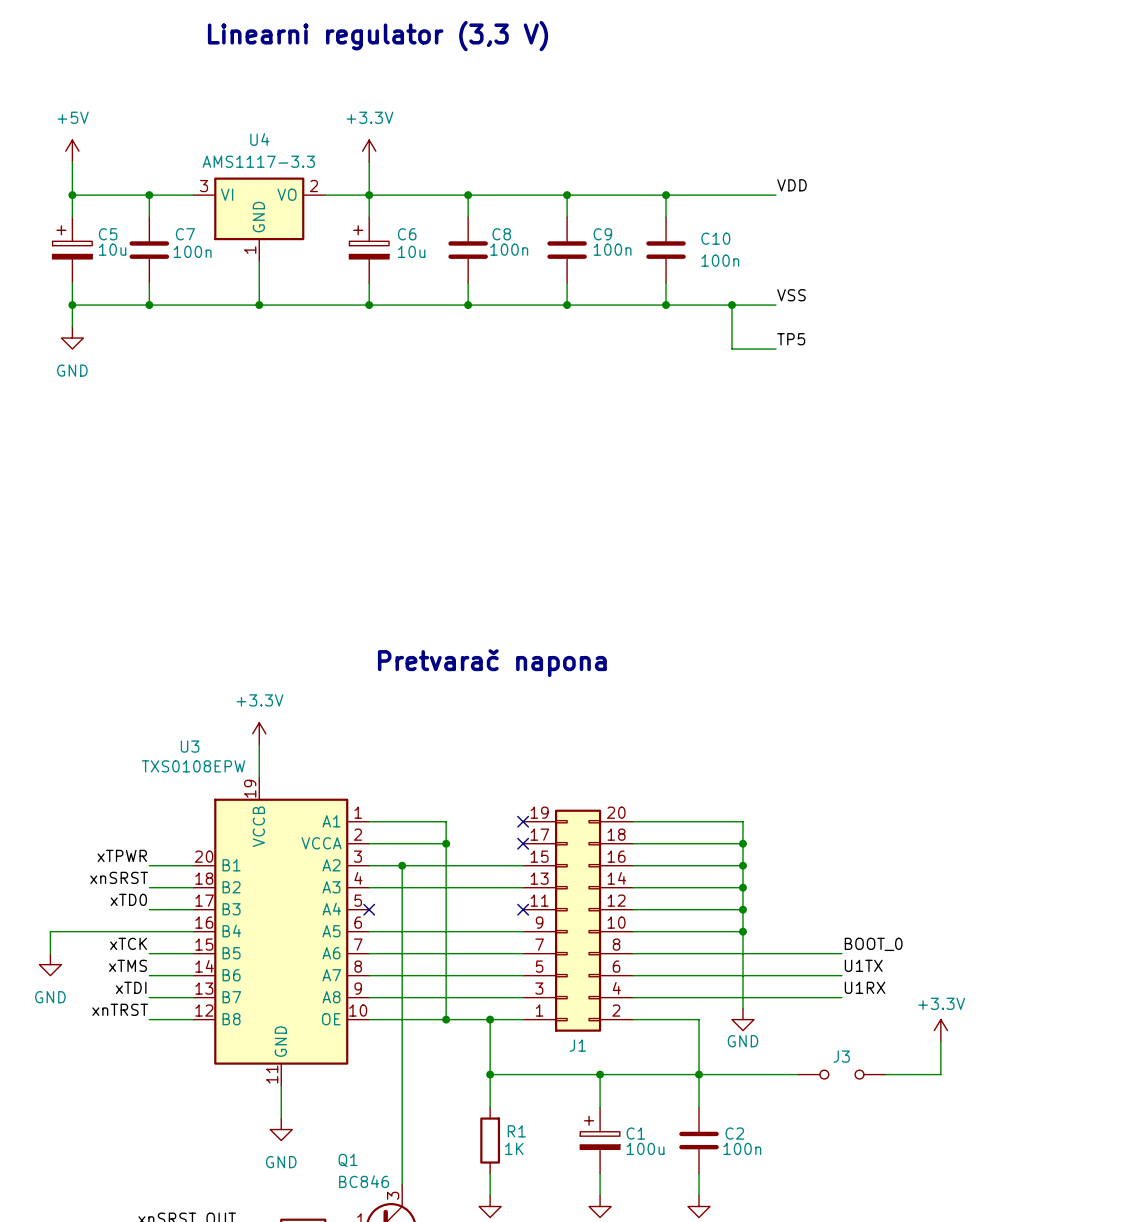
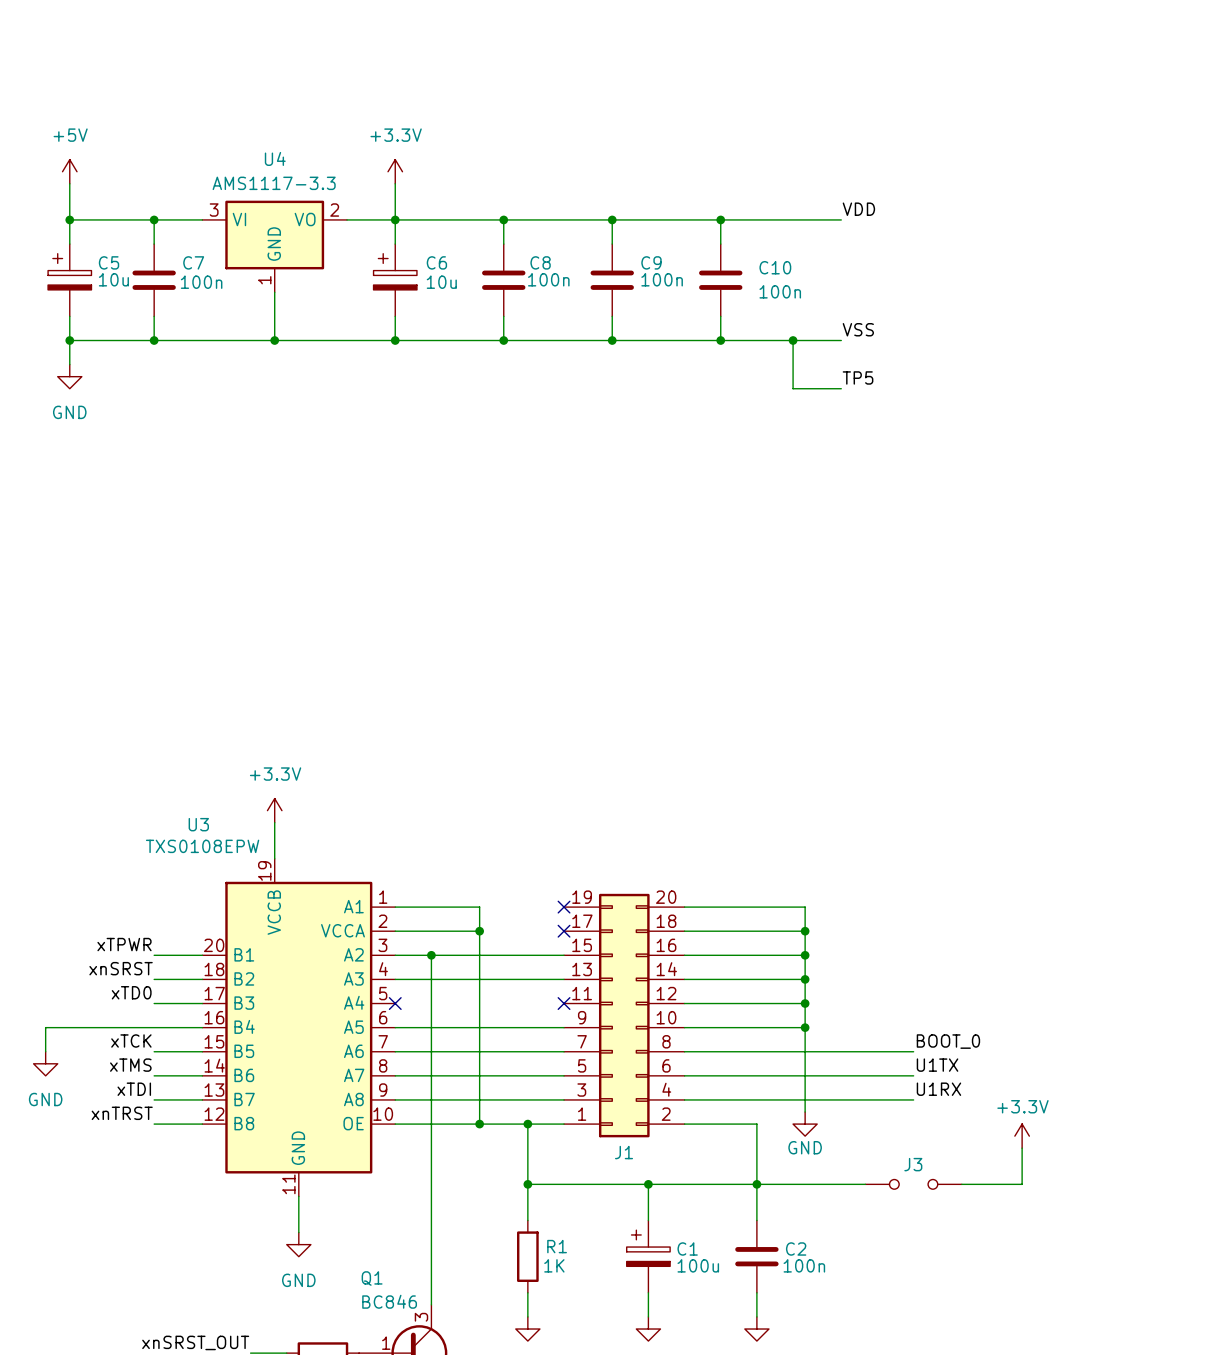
text: Linearni regulator (3,3 V) (378, 36) -> none
text: Pretvarač napona (492, 663) -> none

